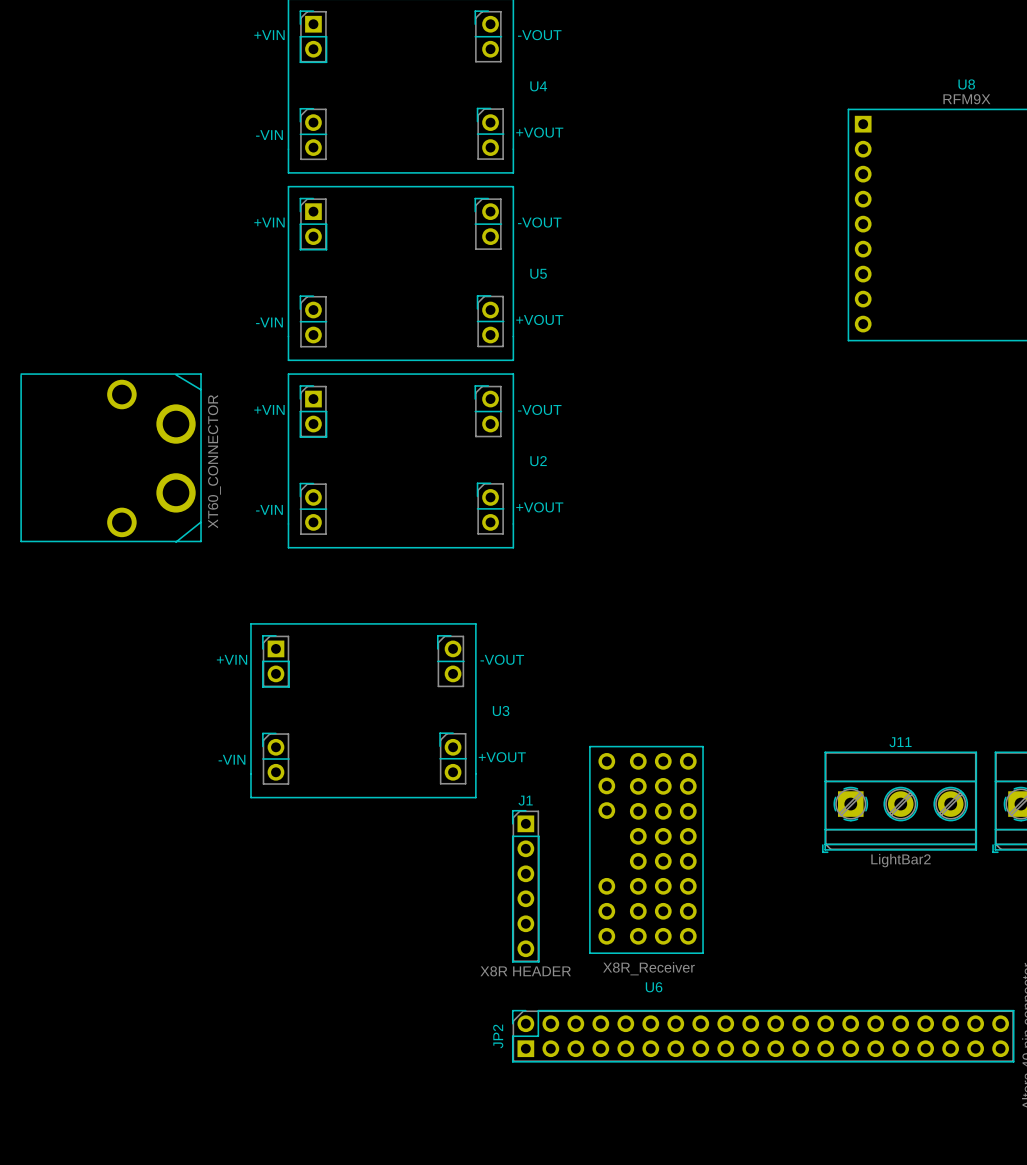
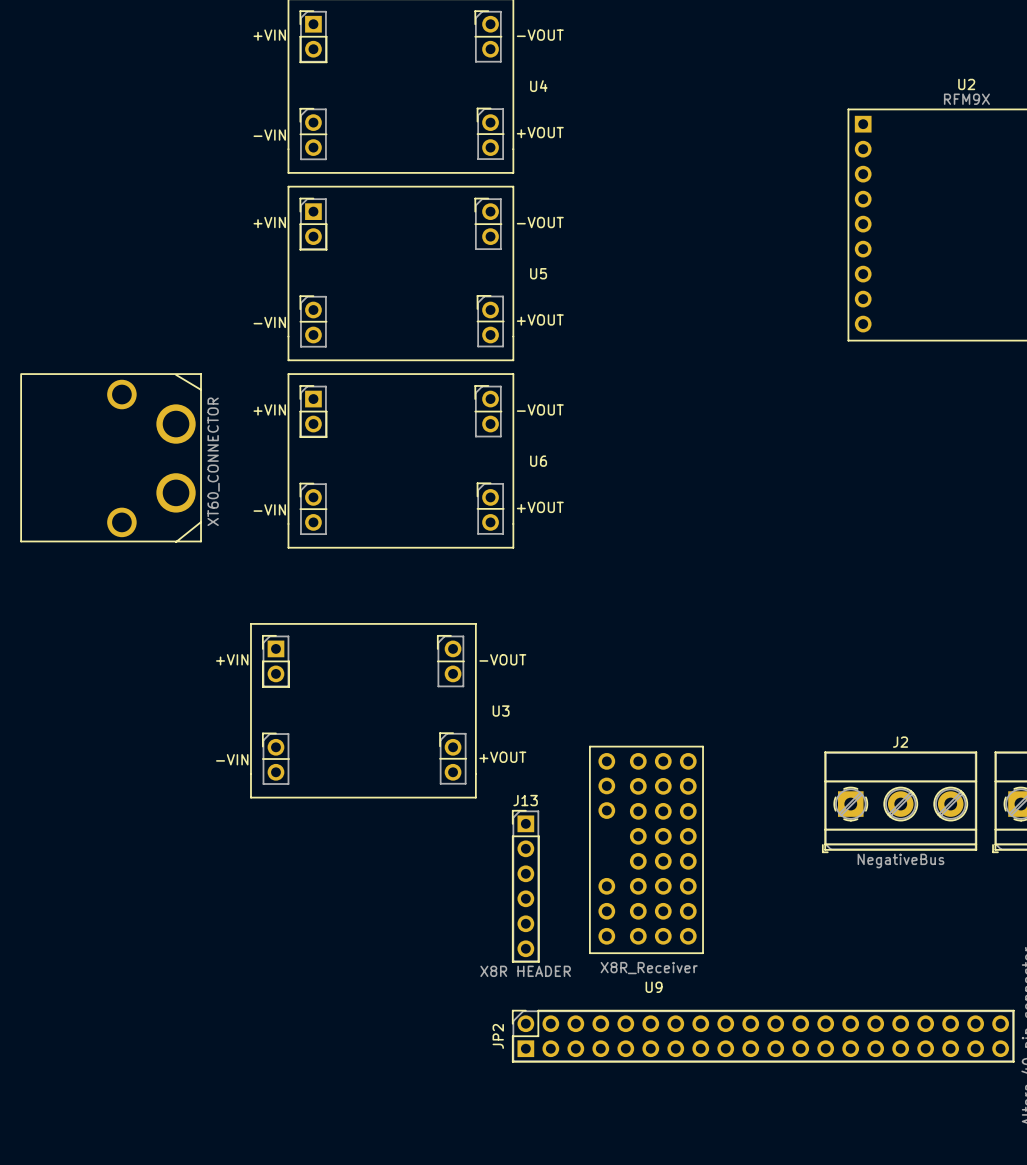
U8 name: U8 (966, 84) -> U2 (966, 84)
U2 name: U2 (538, 461) -> U6 (538, 461)
J11 name: J11 (900, 742) -> J2 (900, 742)
J1 name: J1 (525, 800) -> J13 (525, 800)
J11 value: LightBar2 (900, 860) -> NegativeBus (901, 861)
U6 name: U6 (654, 987) -> U9 (654, 987)

